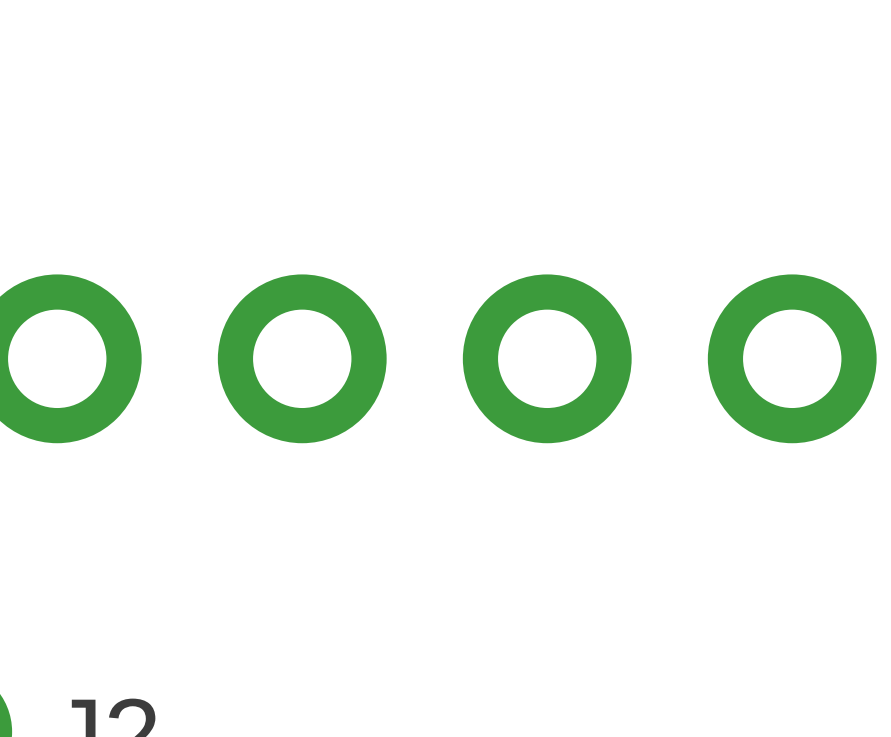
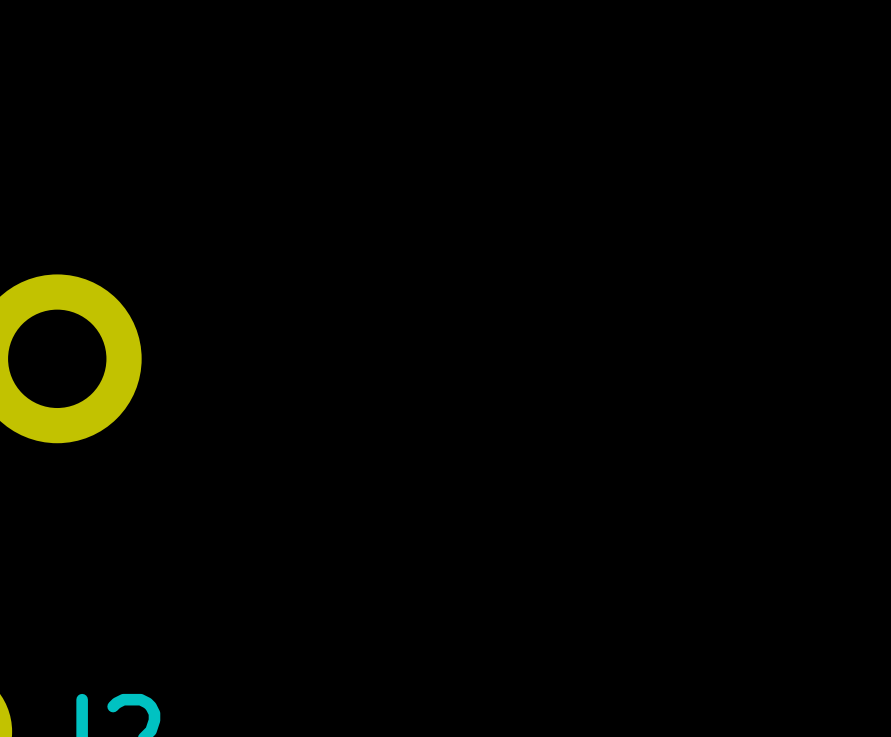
part: (302, 358) -> none
part: (547, 358) -> none
part: (792, 358) -> none

